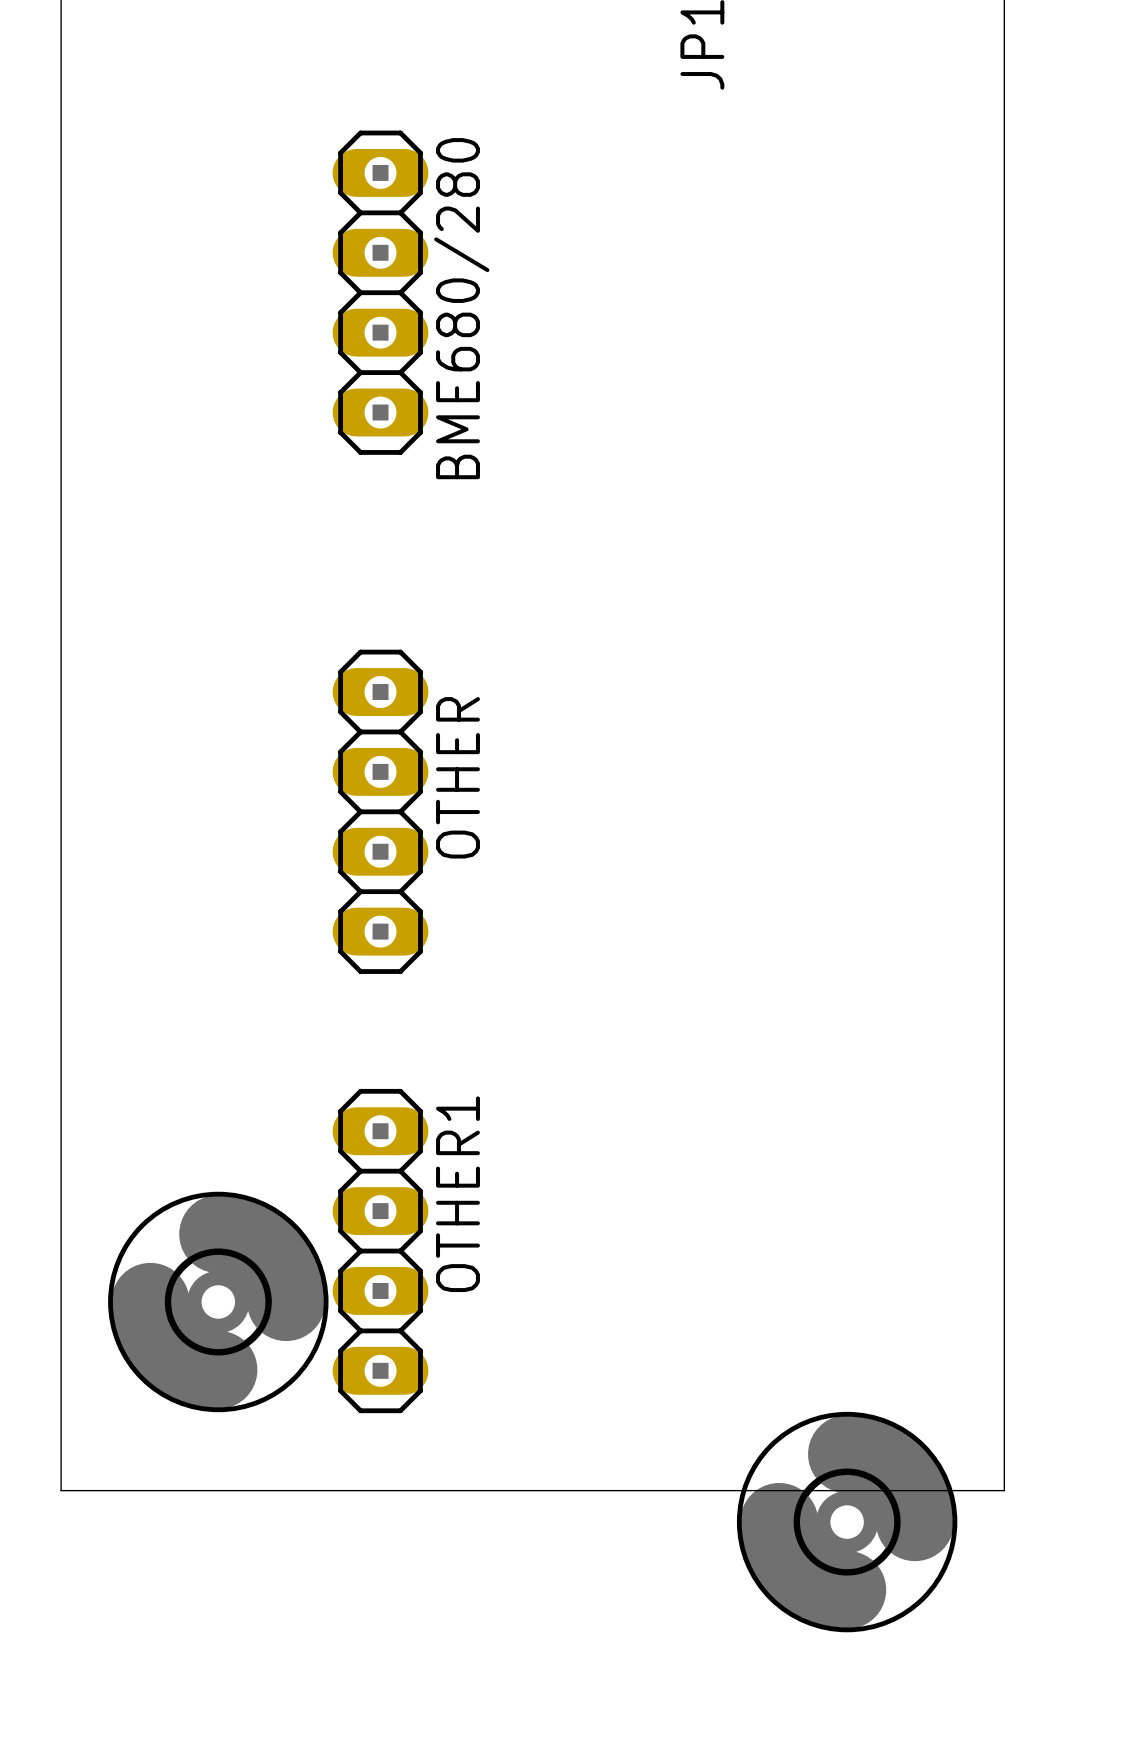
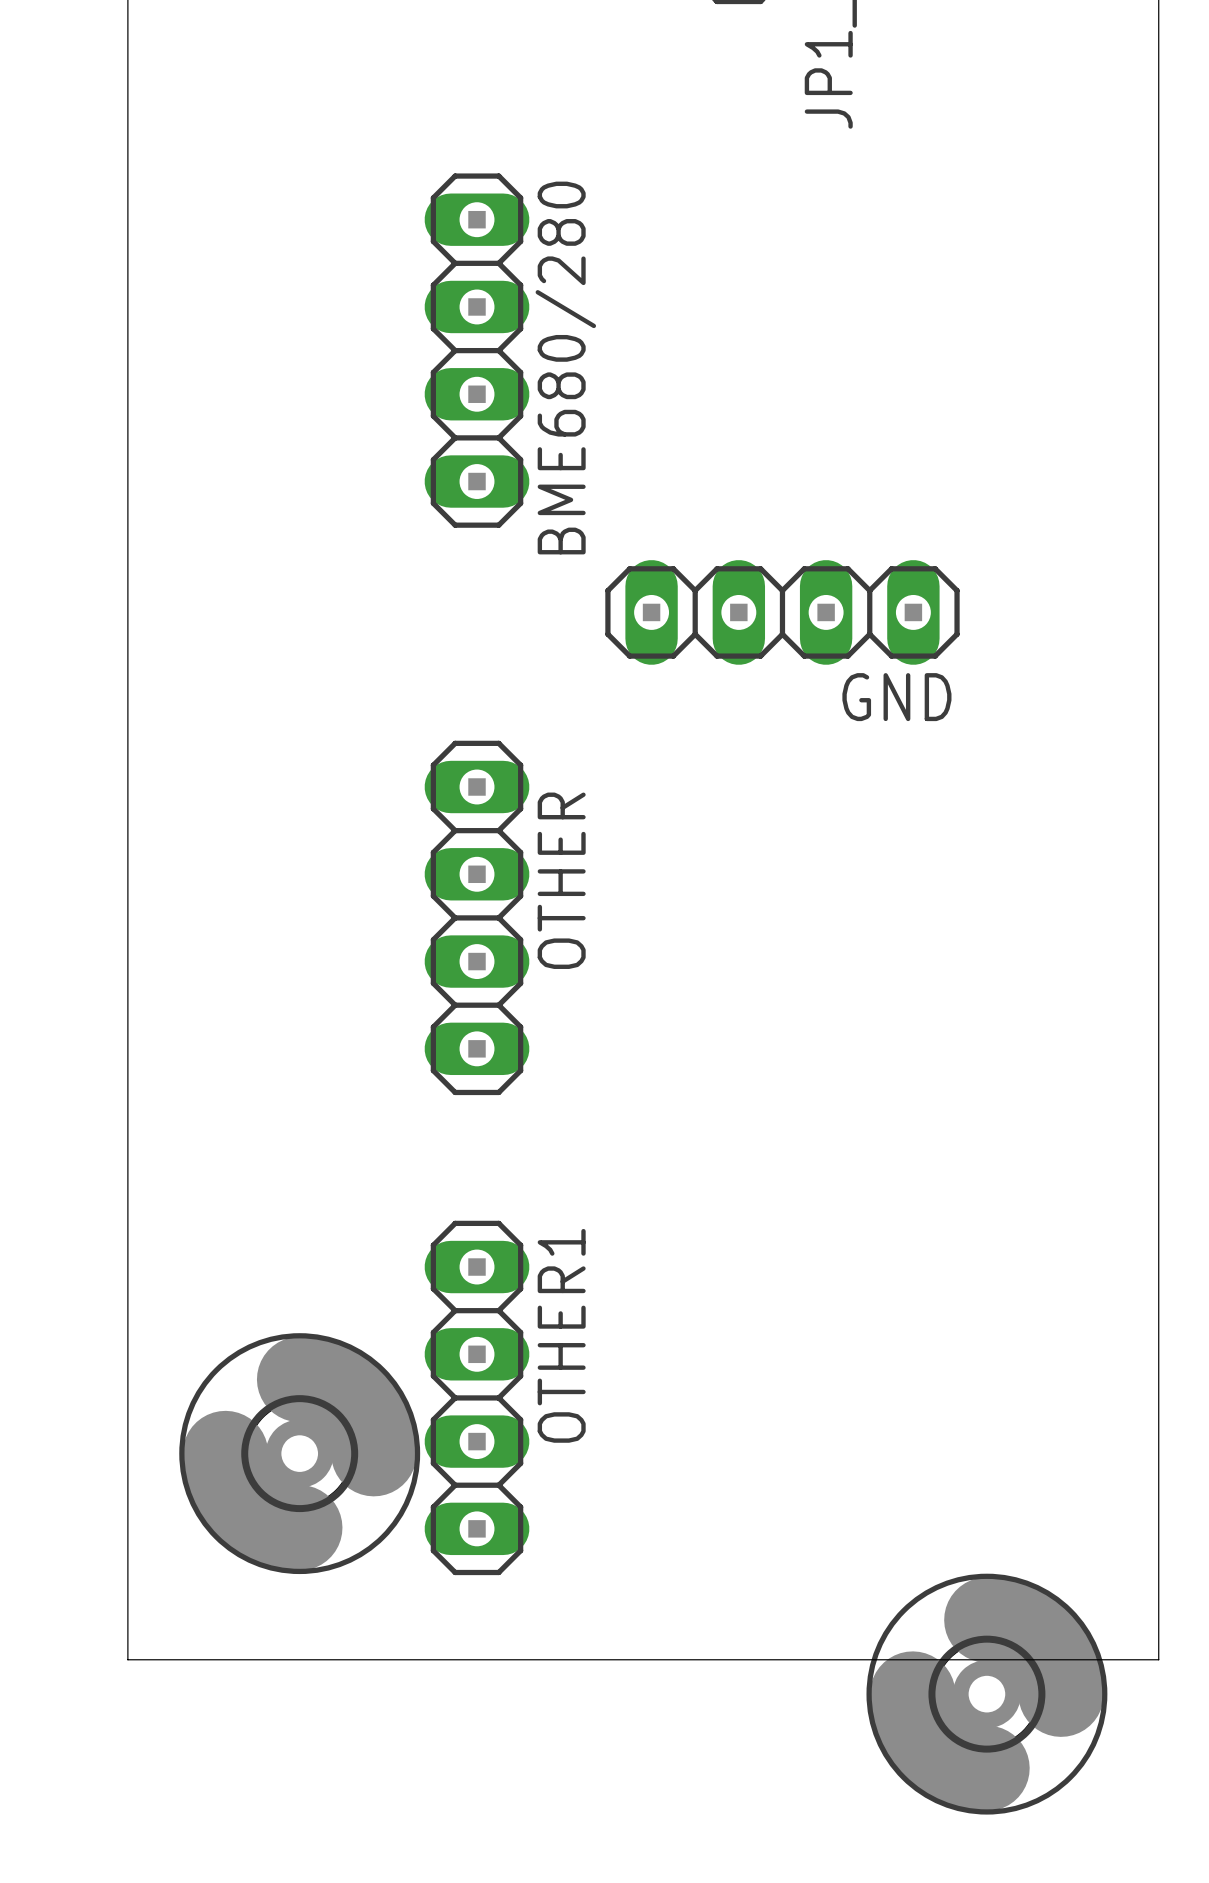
GND: none -> (782, 612)

